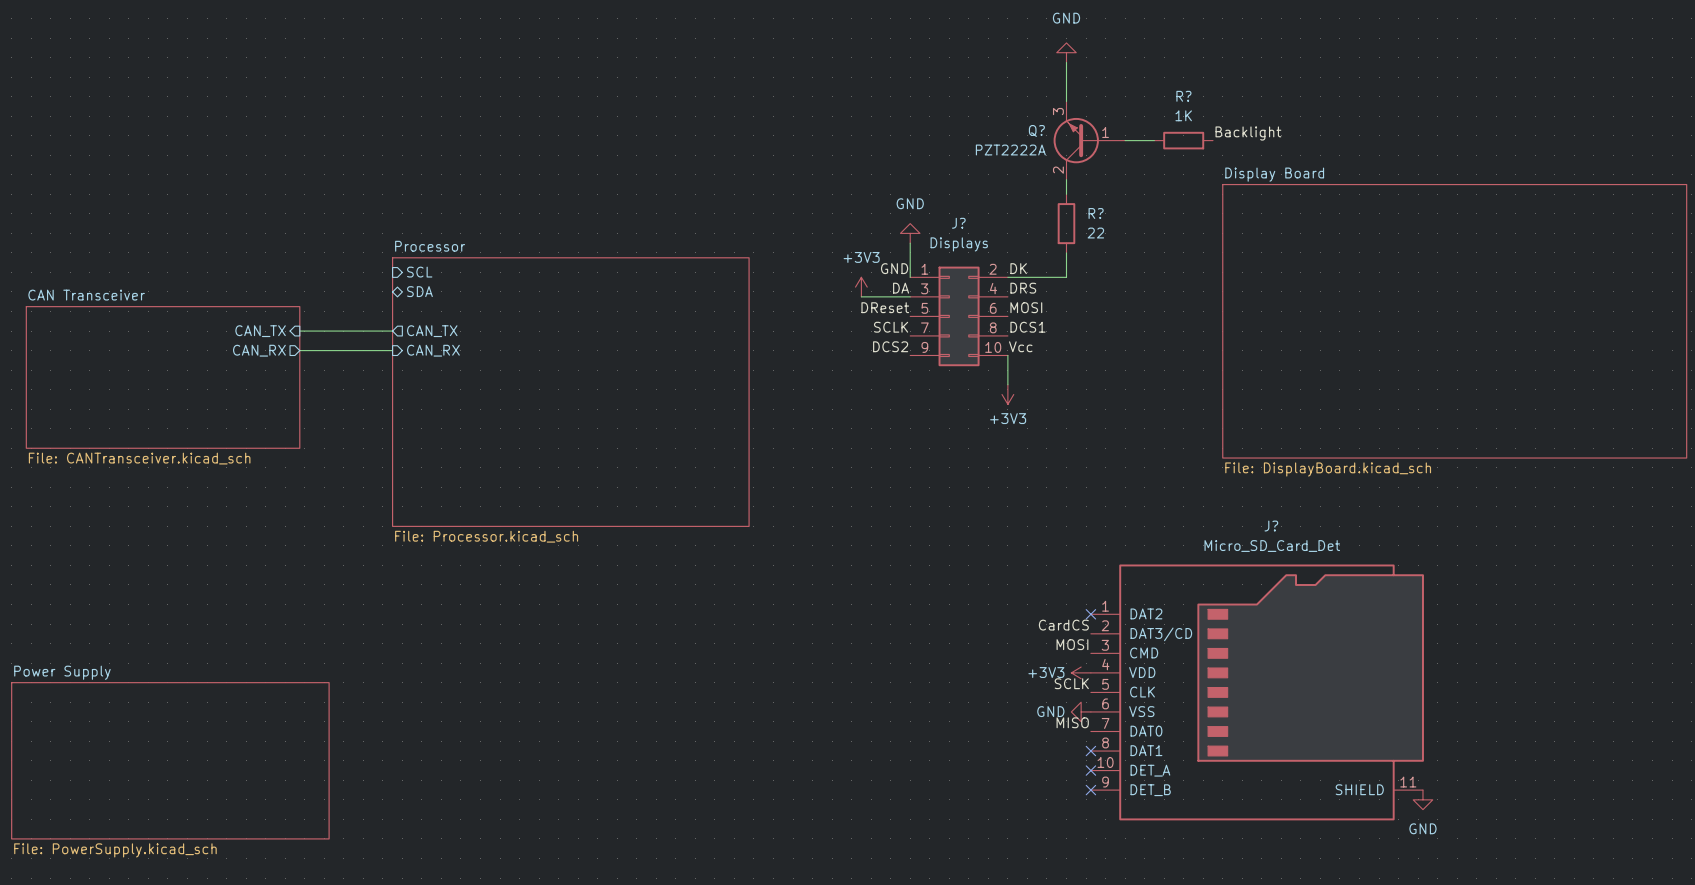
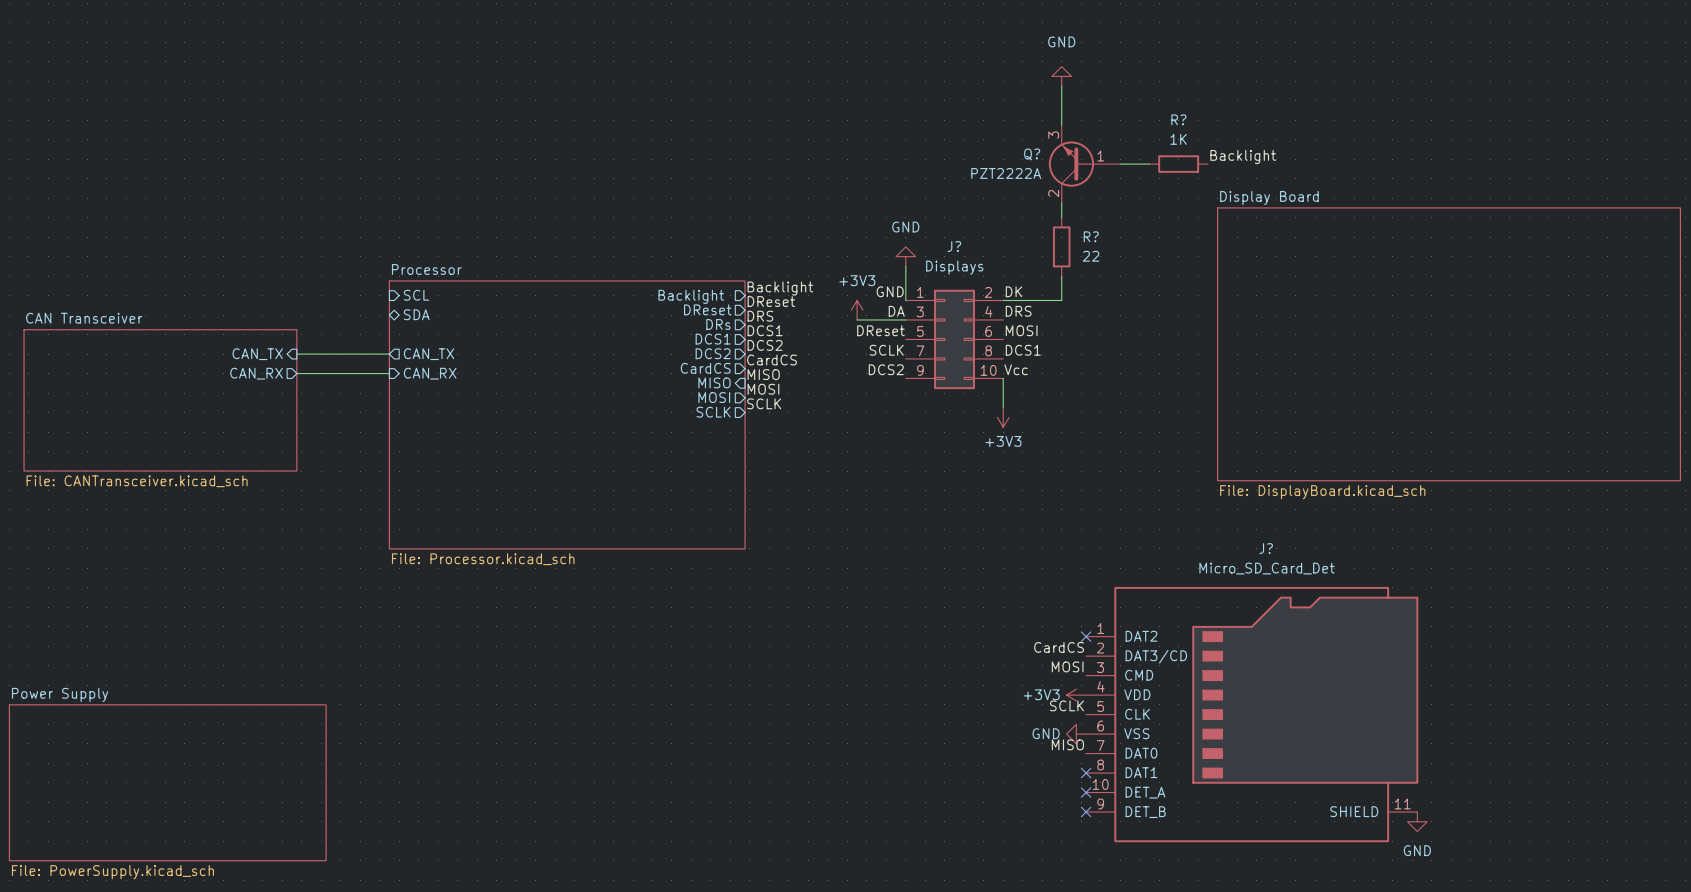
label: none -> Backlight (780, 288)
sheet pin: none -> Backlight (691, 296)
label: none -> DReset (771, 301)
sheet pin: none -> DReset (707, 309)
label: none -> DRS (760, 316)
sheet pin: none -> DRs (718, 324)
label: none -> DCS1 (765, 330)
sheet pin: none -> DCS1 (713, 339)
label: none -> DCS2 (765, 345)
sheet pin: none -> DCS2 (713, 353)
label: none -> CardCS (772, 360)
sheet pin: none -> CardCS (705, 368)
label: none -> MISO (763, 374)
sheet pin: none -> MISO (714, 382)
label: none -> MOSI (763, 389)
sheet pin: none -> MOSI (714, 397)
label: none -> SCLK (764, 403)
sheet pin: none -> SCLK (713, 412)

